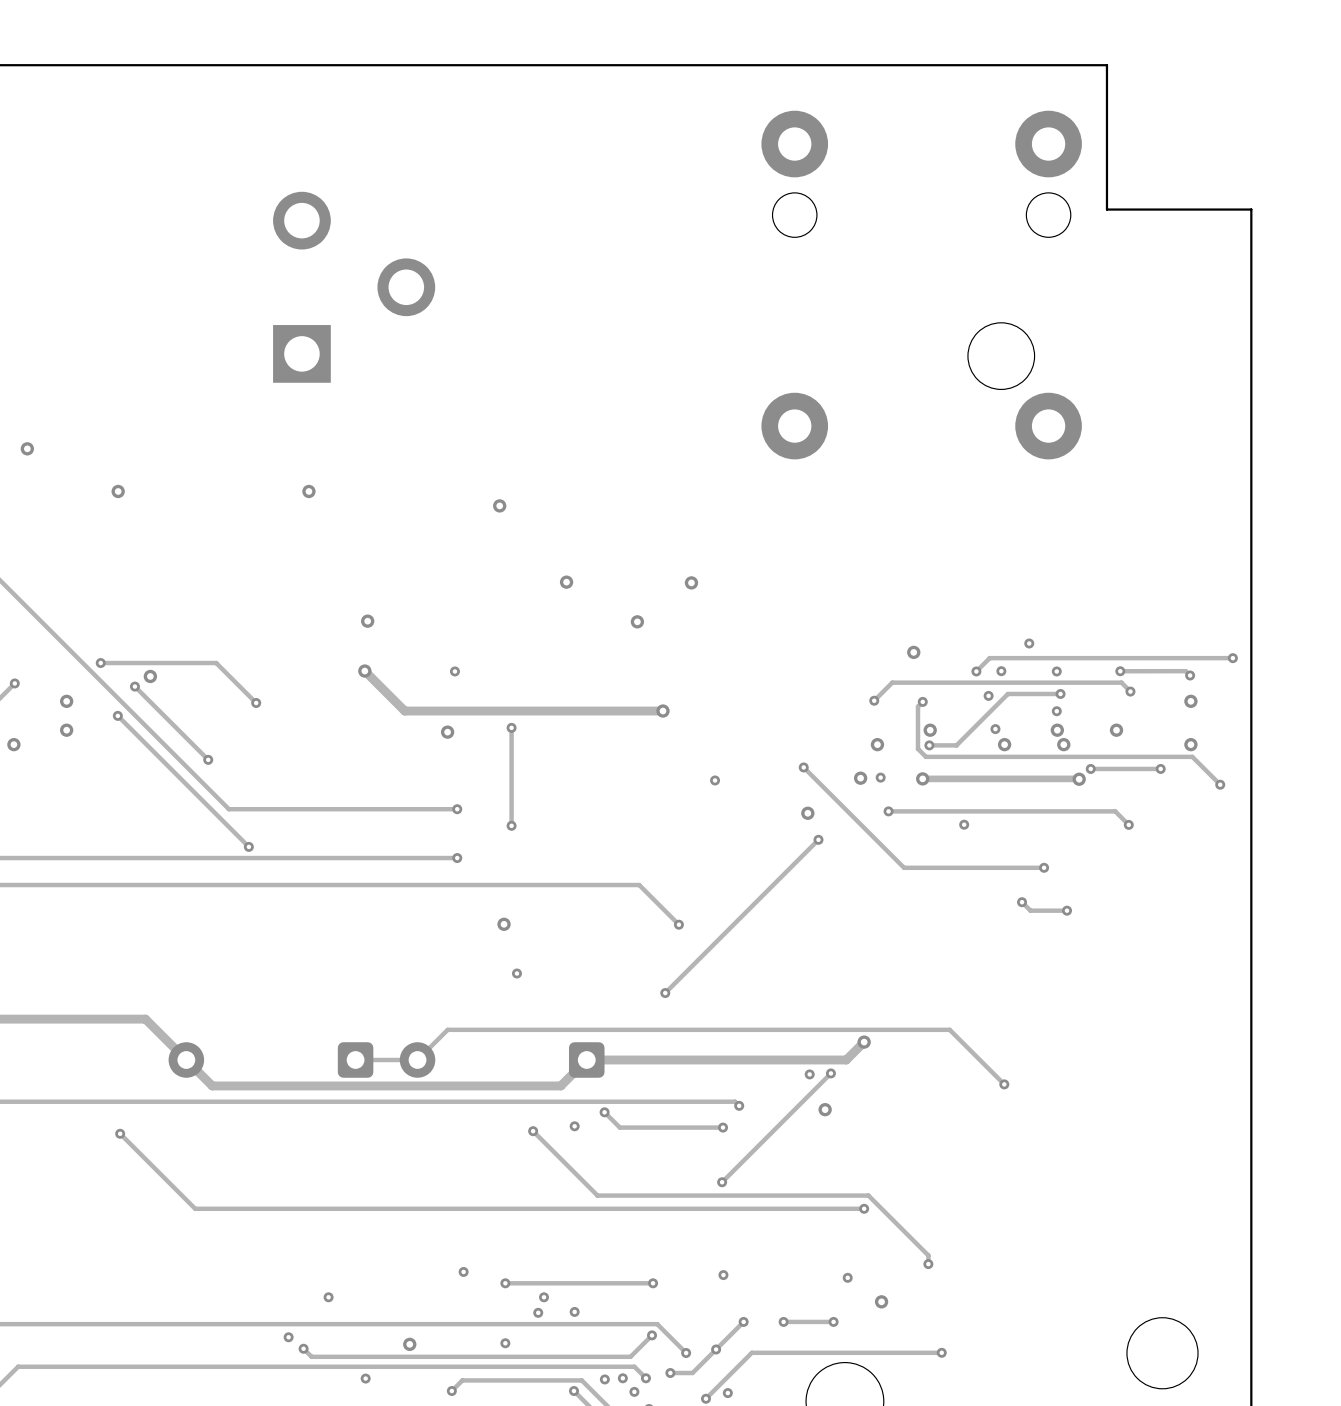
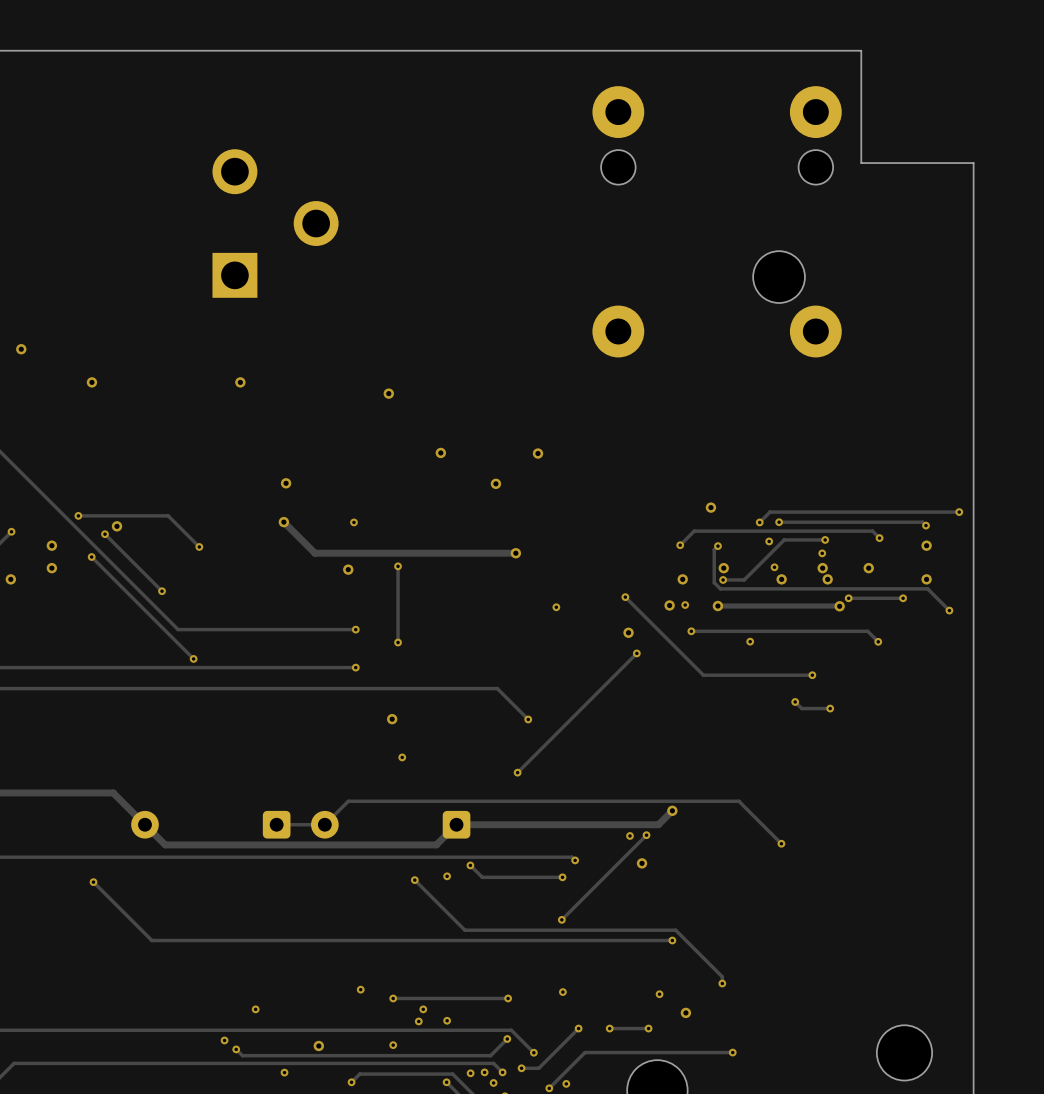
via: (1029, 643) -> none
via: (1056, 671) -> none
via: (1120, 671) -> none
track: (1185, 671) (1120, 671) -> (922, 522) (779, 522)
via: (716, 1349) -> none

